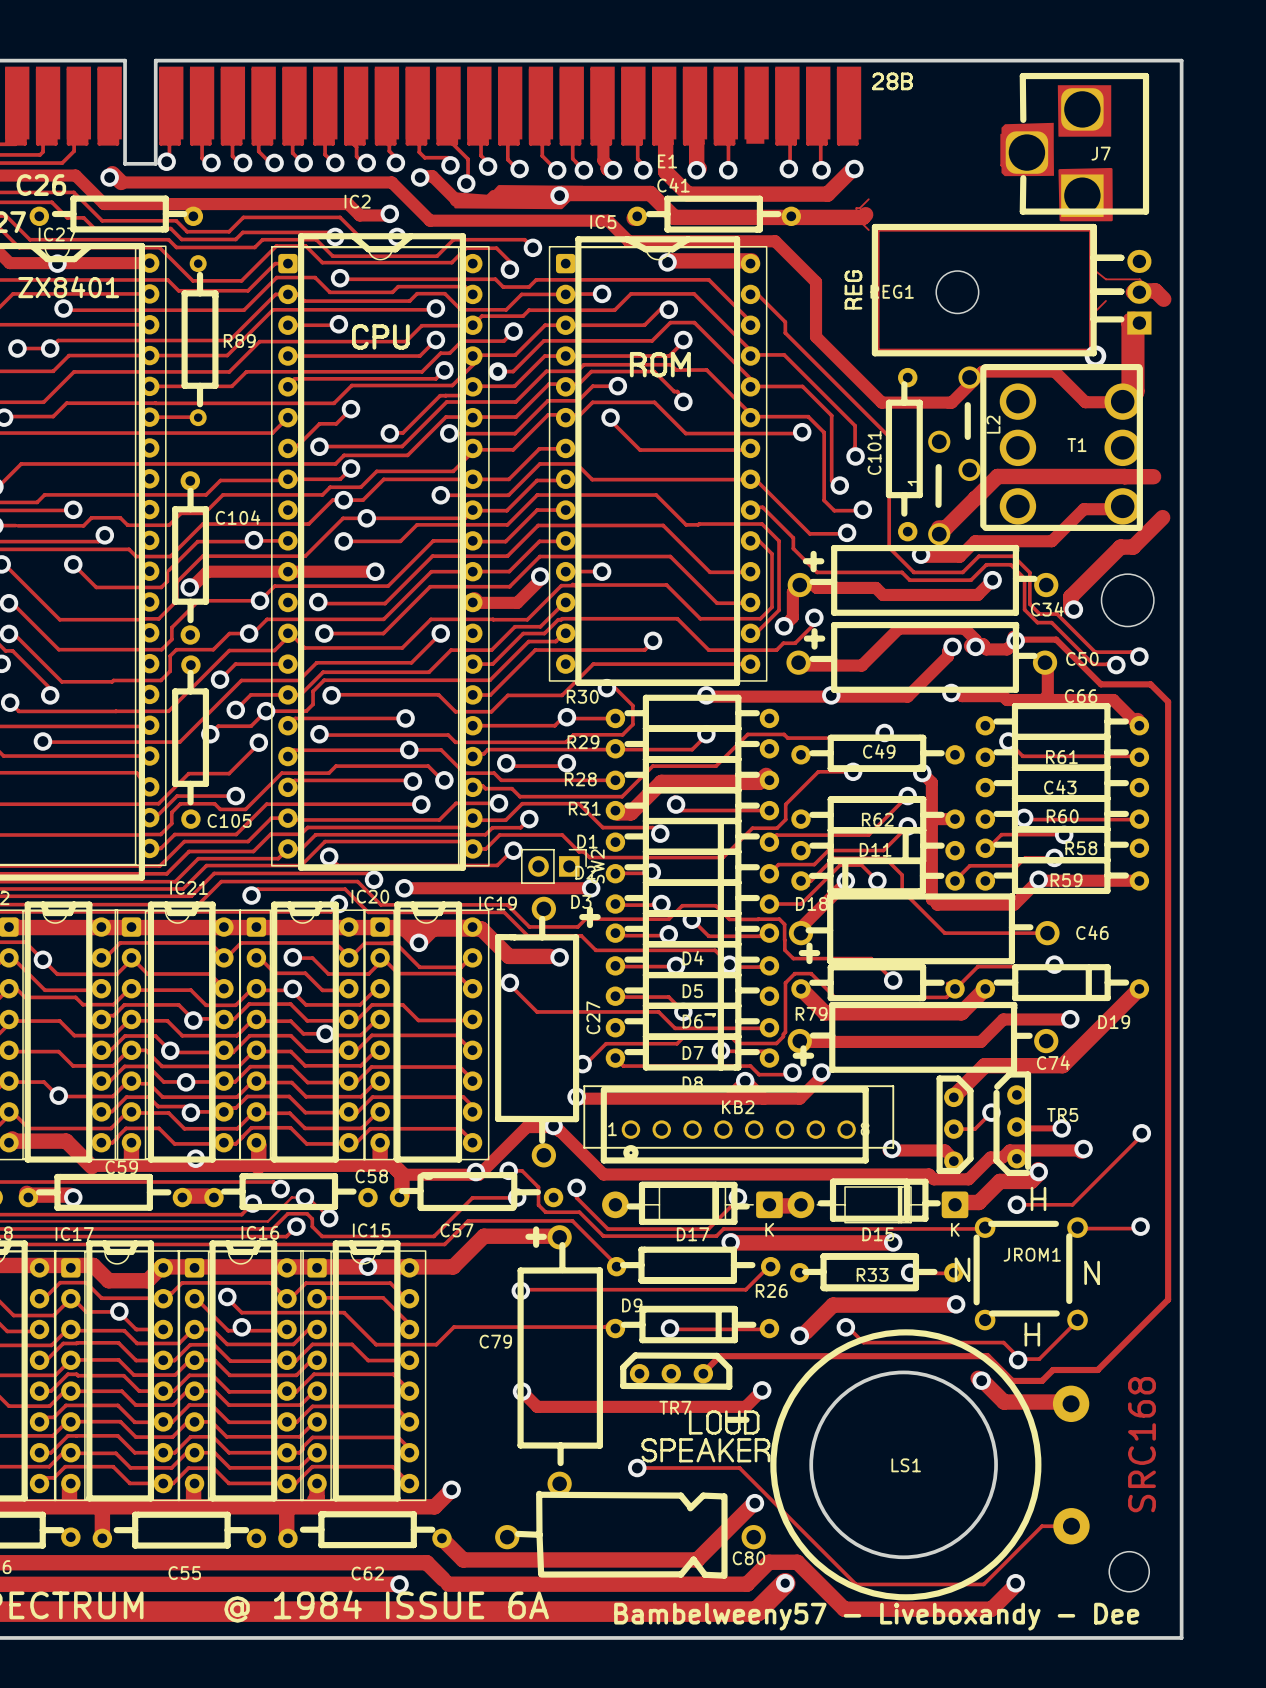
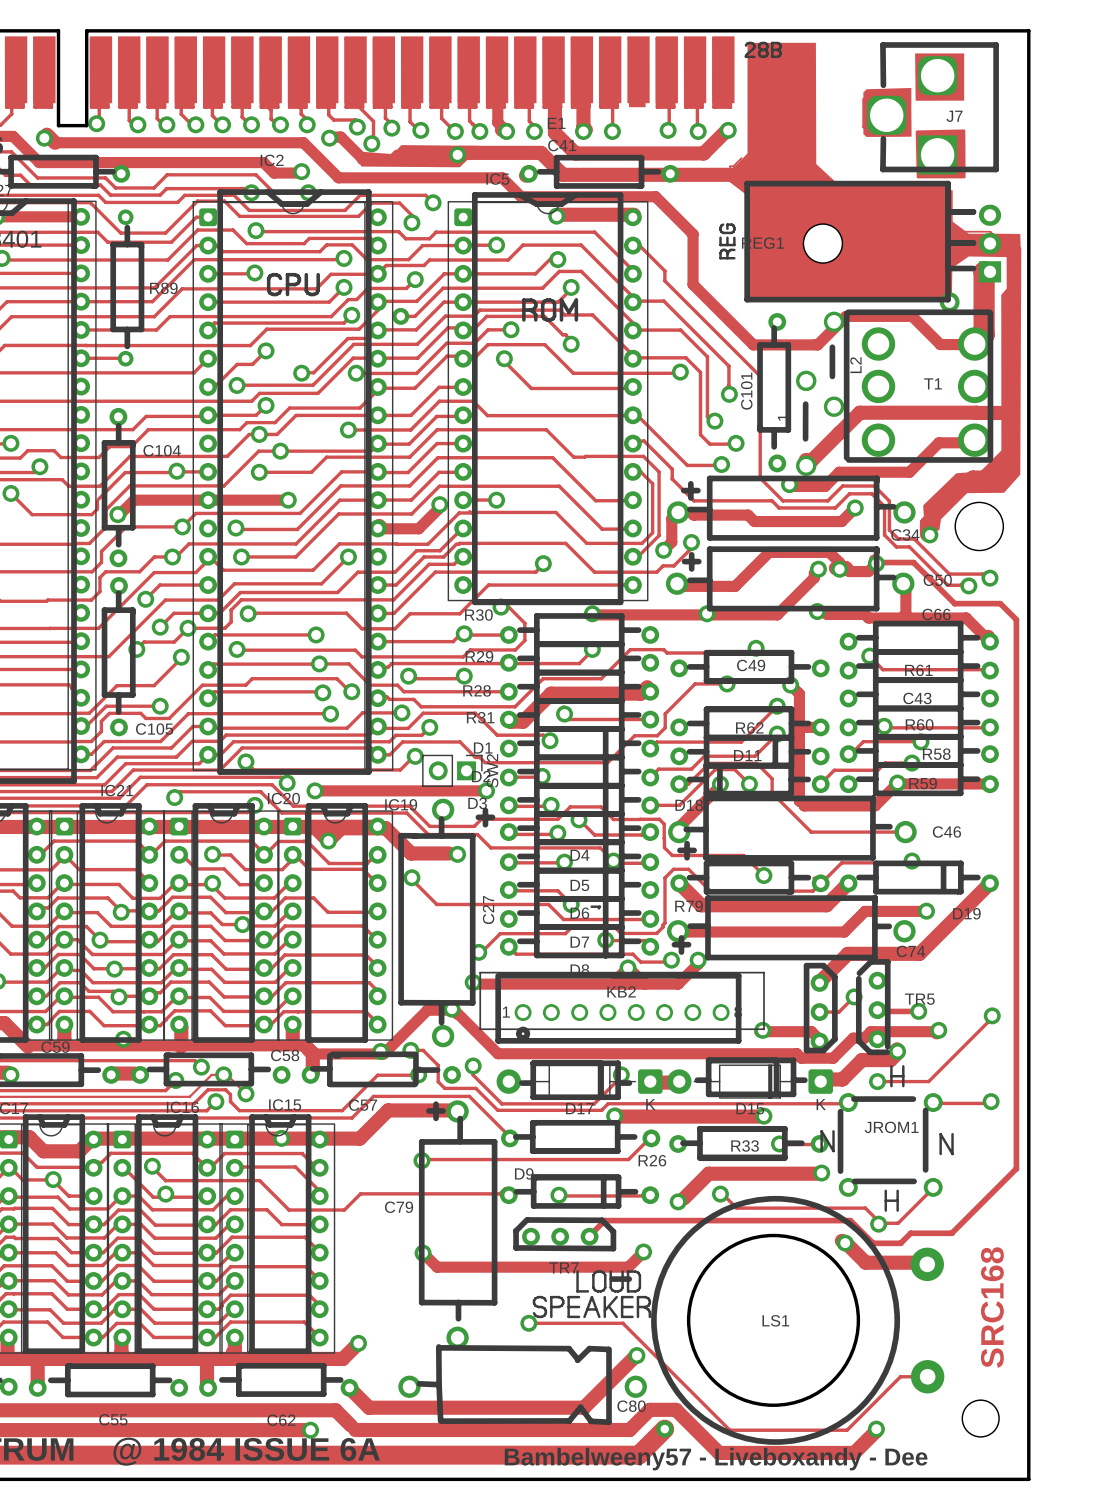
drawing: none -> [727, 42, 1022, 532]

